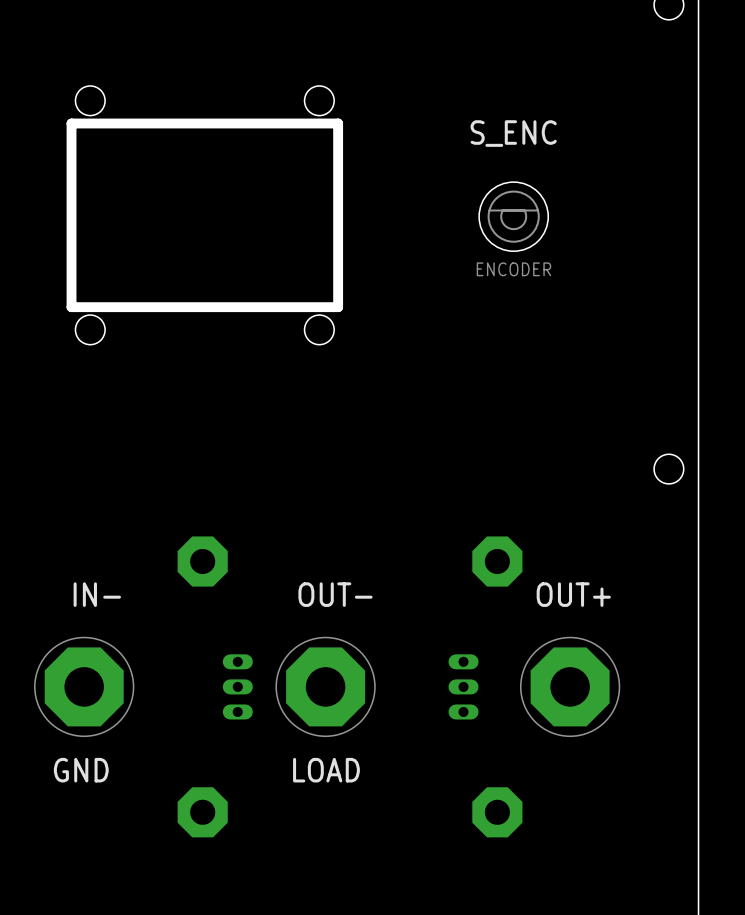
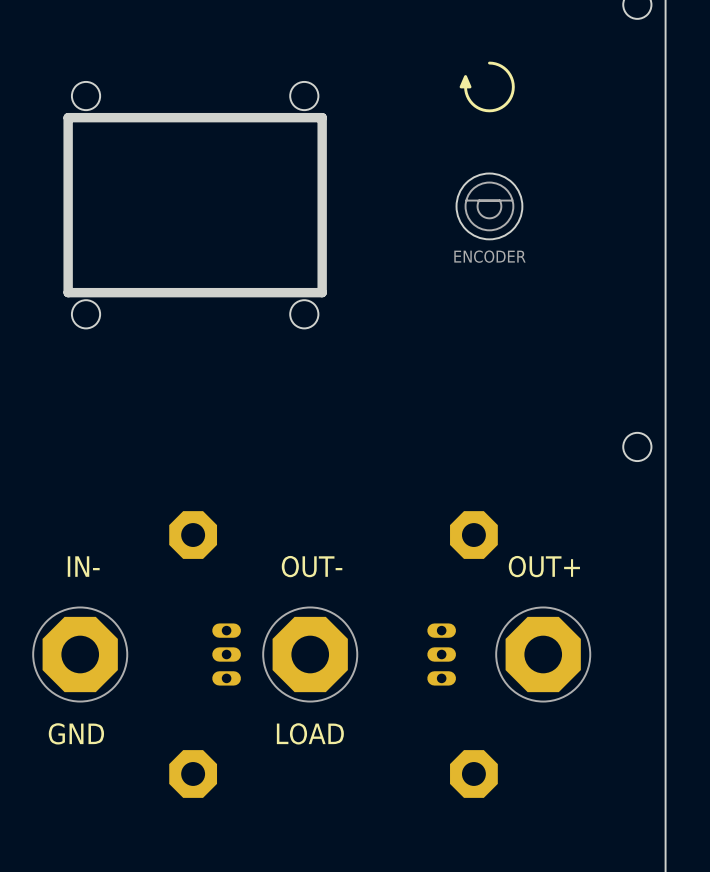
line: none -> (489, 63) (504, 67) (511, 77) (512, 93) (506, 103) (495, 110) (480, 109) (470, 101) (465, 86)
drawing: none -> [459, 75, 472, 89]
S_ENC name: S_ENC (513, 133) -> none

